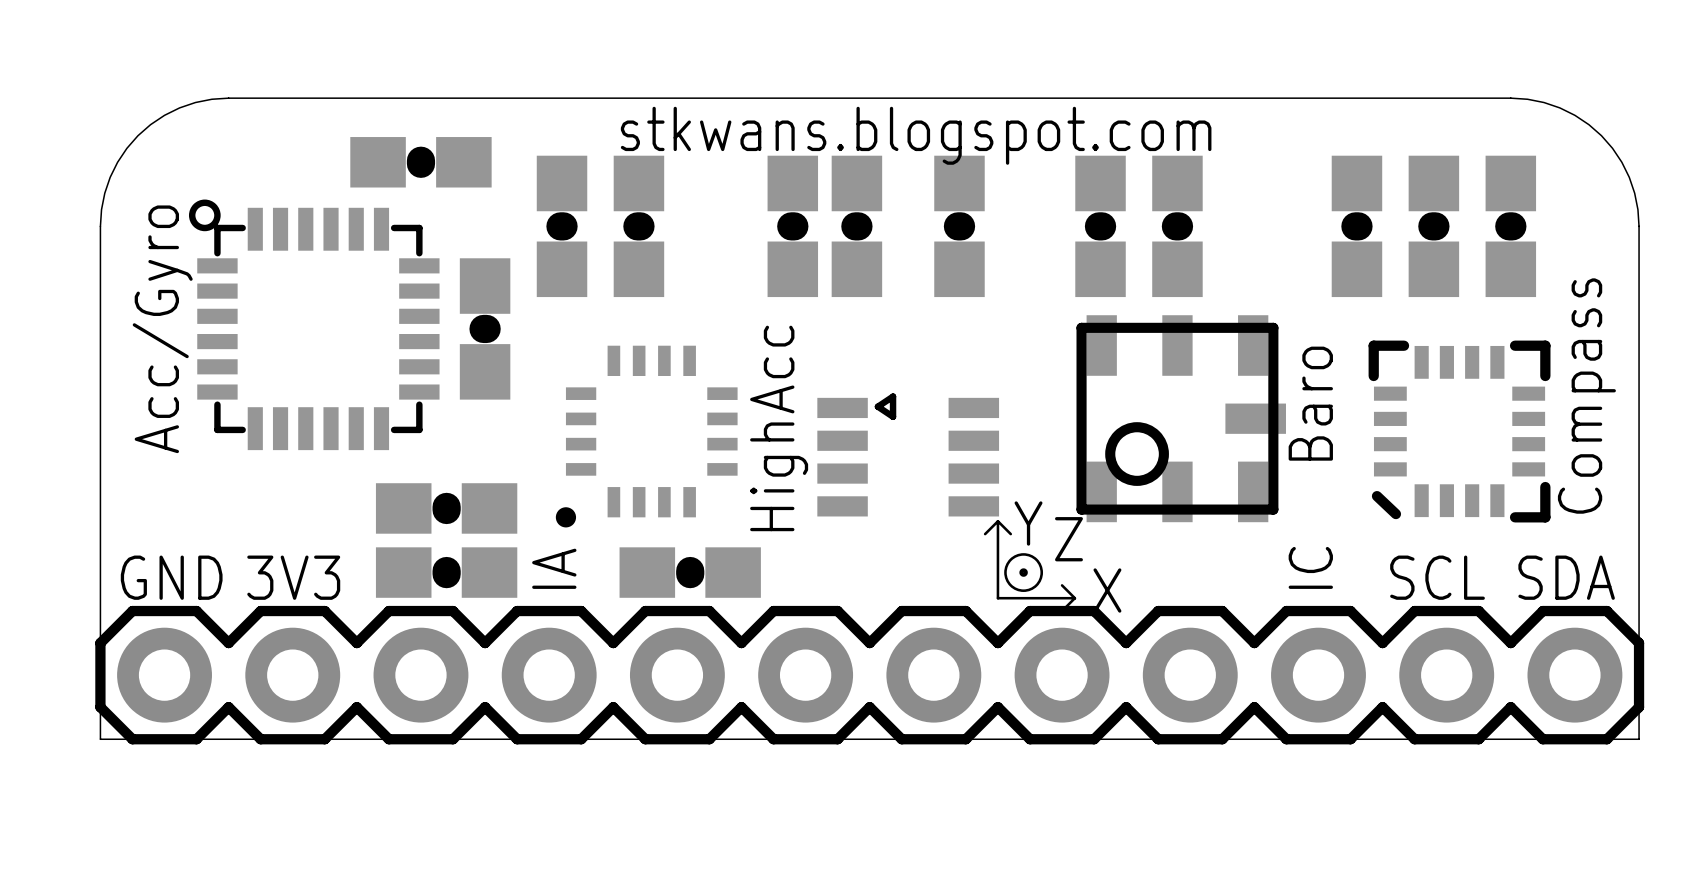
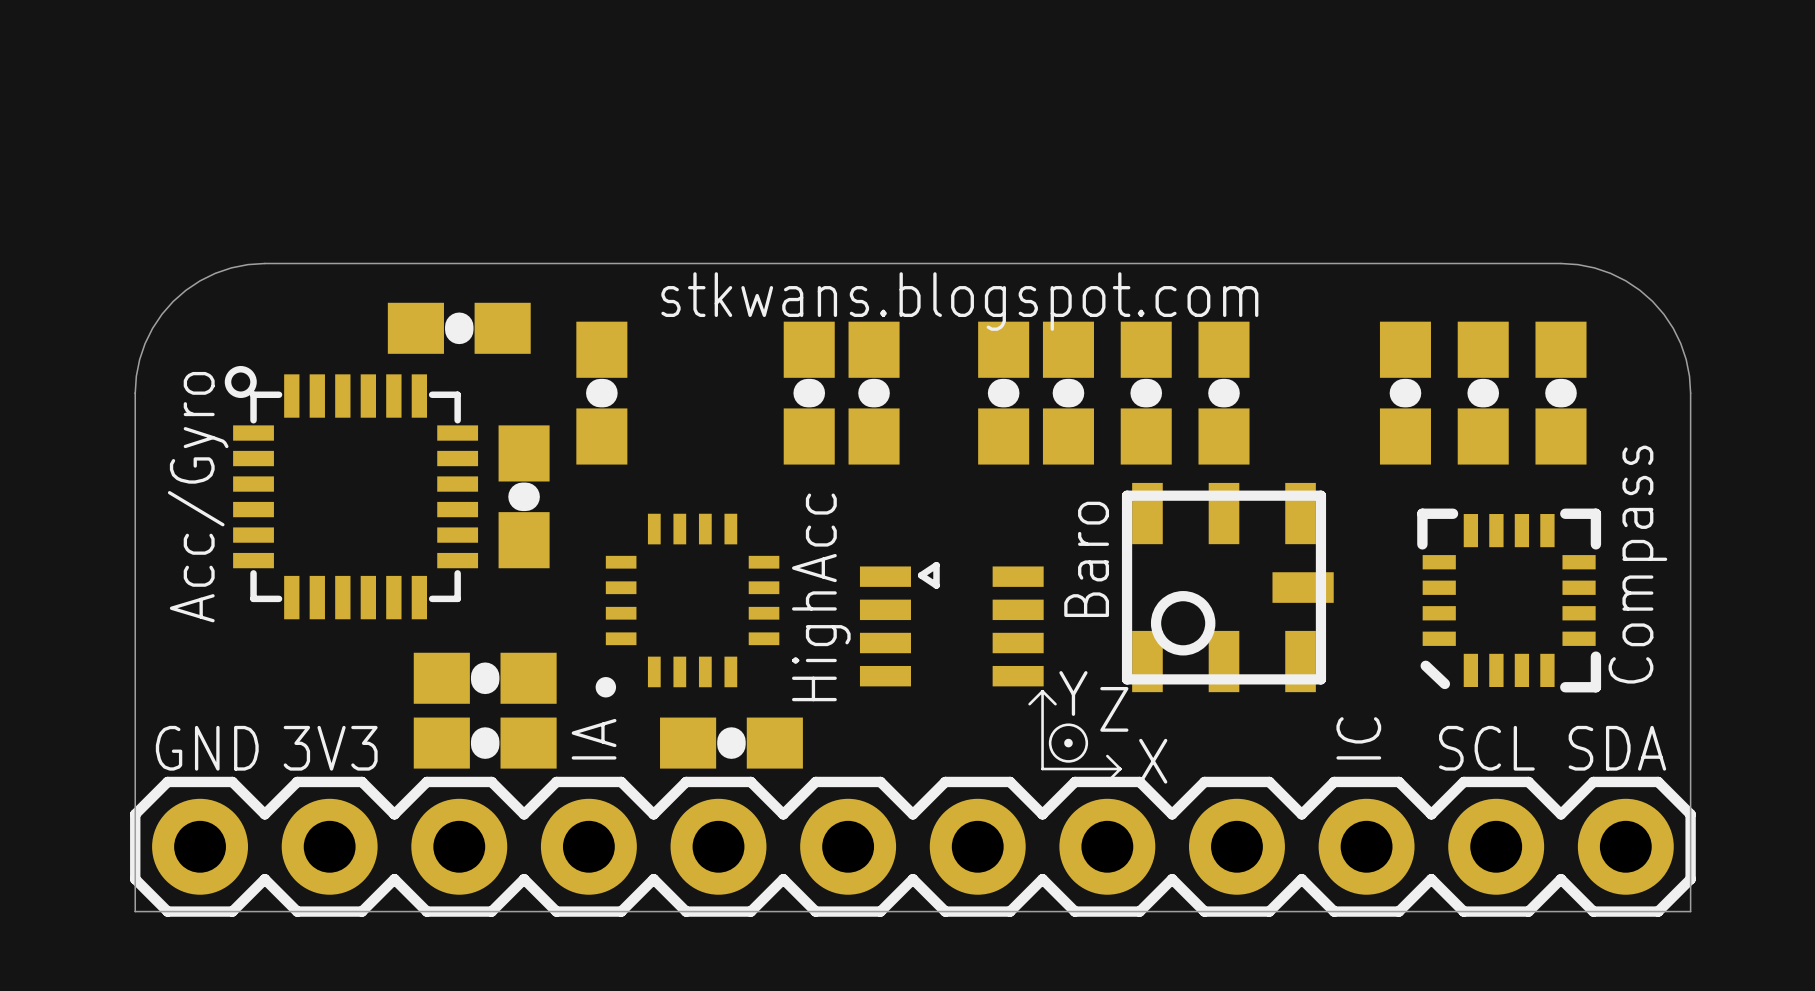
part: (638, 226) -> none
part: none -> (809, 393)
part: (792, 226) -> none
part: none -> (874, 393)
part: (856, 226) -> none
part: none -> (1068, 393)
text position: Baro (1310, 403) -> Baro (1086, 559)

